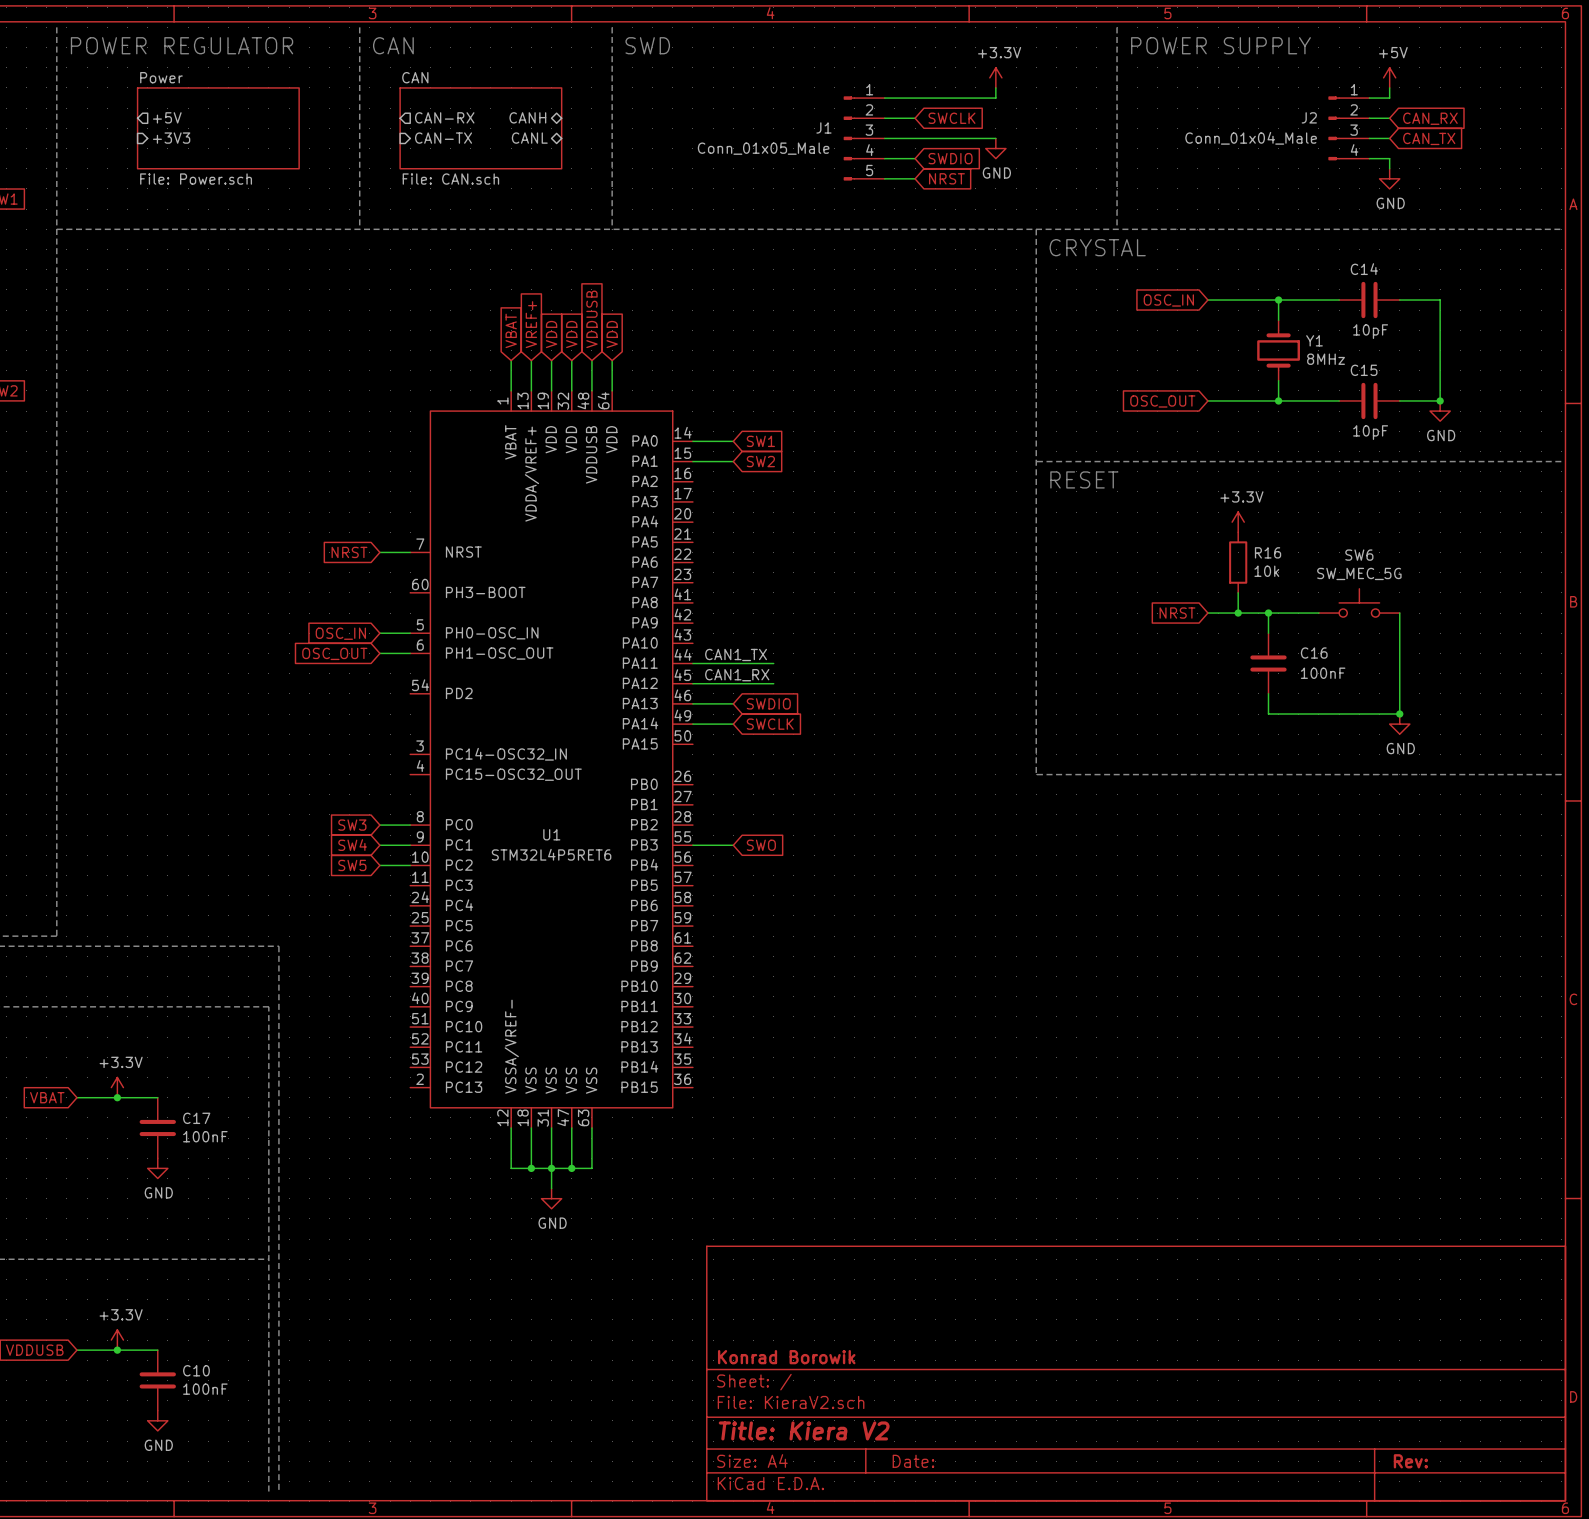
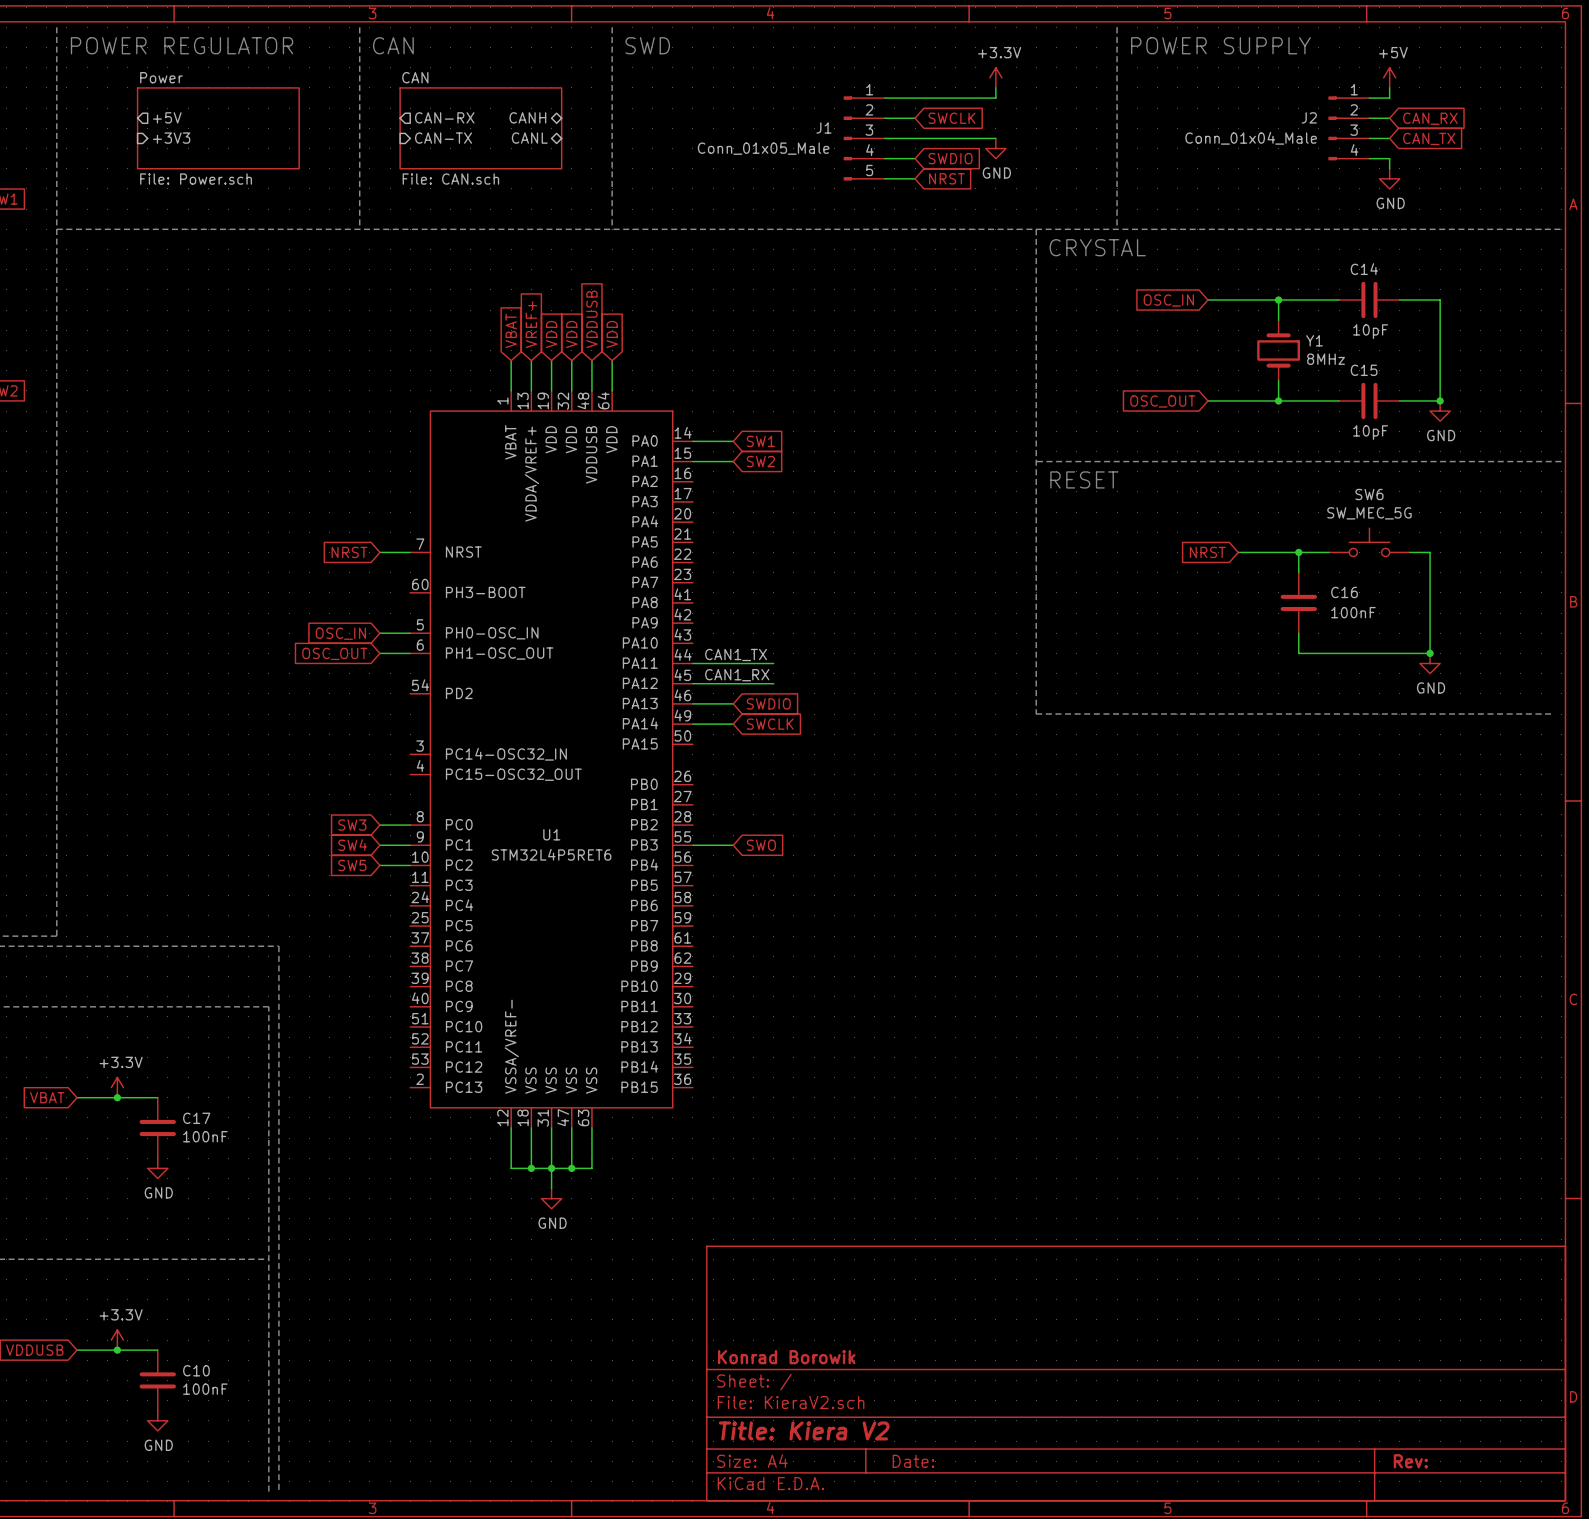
power symbol: +3.3V (1238, 522) -> none
wire: none -> (1238, 552) (1329, 552)
junction: none -> (1298, 552)
wire: none -> (1409, 552) (1430, 552) (1430, 653) (1298, 653) (1298, 633)
R16: 10k (1238, 562) -> none
wire: (1238, 592) (1238, 613) -> none
SW6 position: (1359, 602) -> (1369, 542)
global label position: NRST (1177, 613) -> NRST (1207, 552)
wire: (1207, 613) (1318, 613) -> none
junction: (1238, 613) -> none
wire: (1268, 613) (1268, 633) -> (1298, 552) (1298, 572)
junction: (1268, 613) -> none
wire: (1399, 613) (1399, 714) (1268, 714) (1268, 693) -> none
junction: none -> (1430, 653)
C16 position: (1268, 663) -> (1298, 602)
line: (1036, 714) (1036, 774) (1561, 774) -> (1036, 714) (1551, 714)
junction: (1399, 714) -> none
power symbol position: GND (1399, 724) -> GND (1430, 663)

